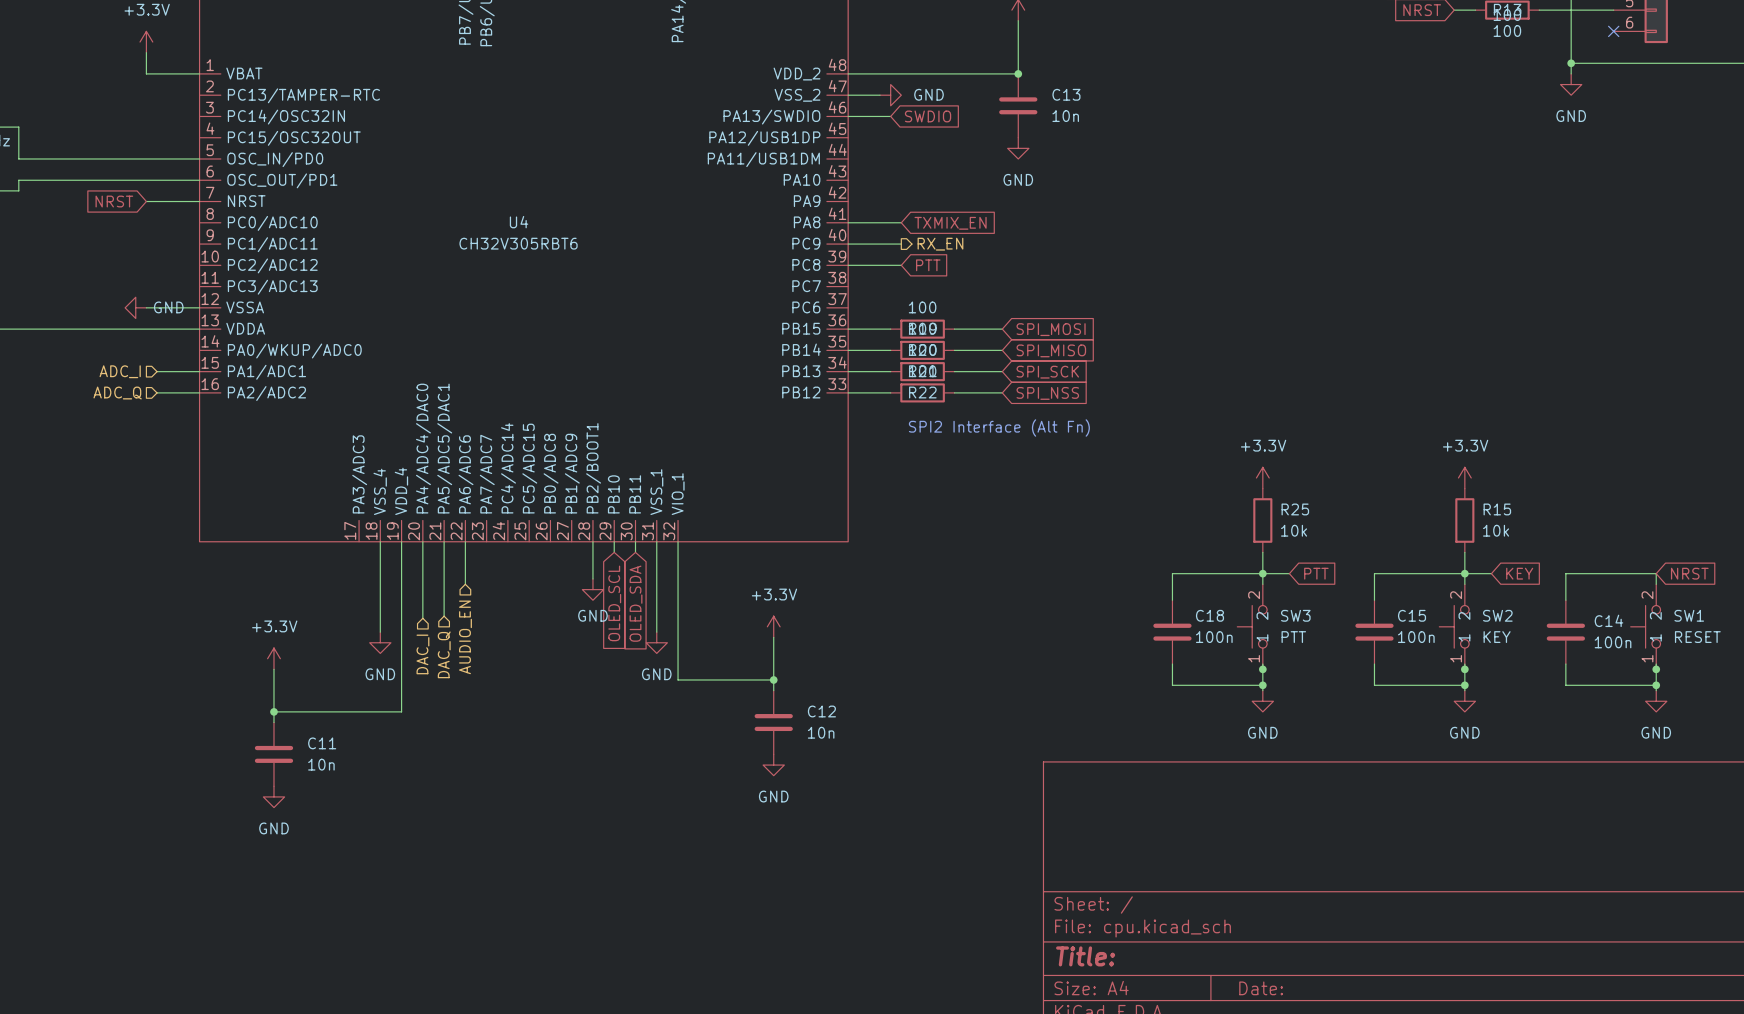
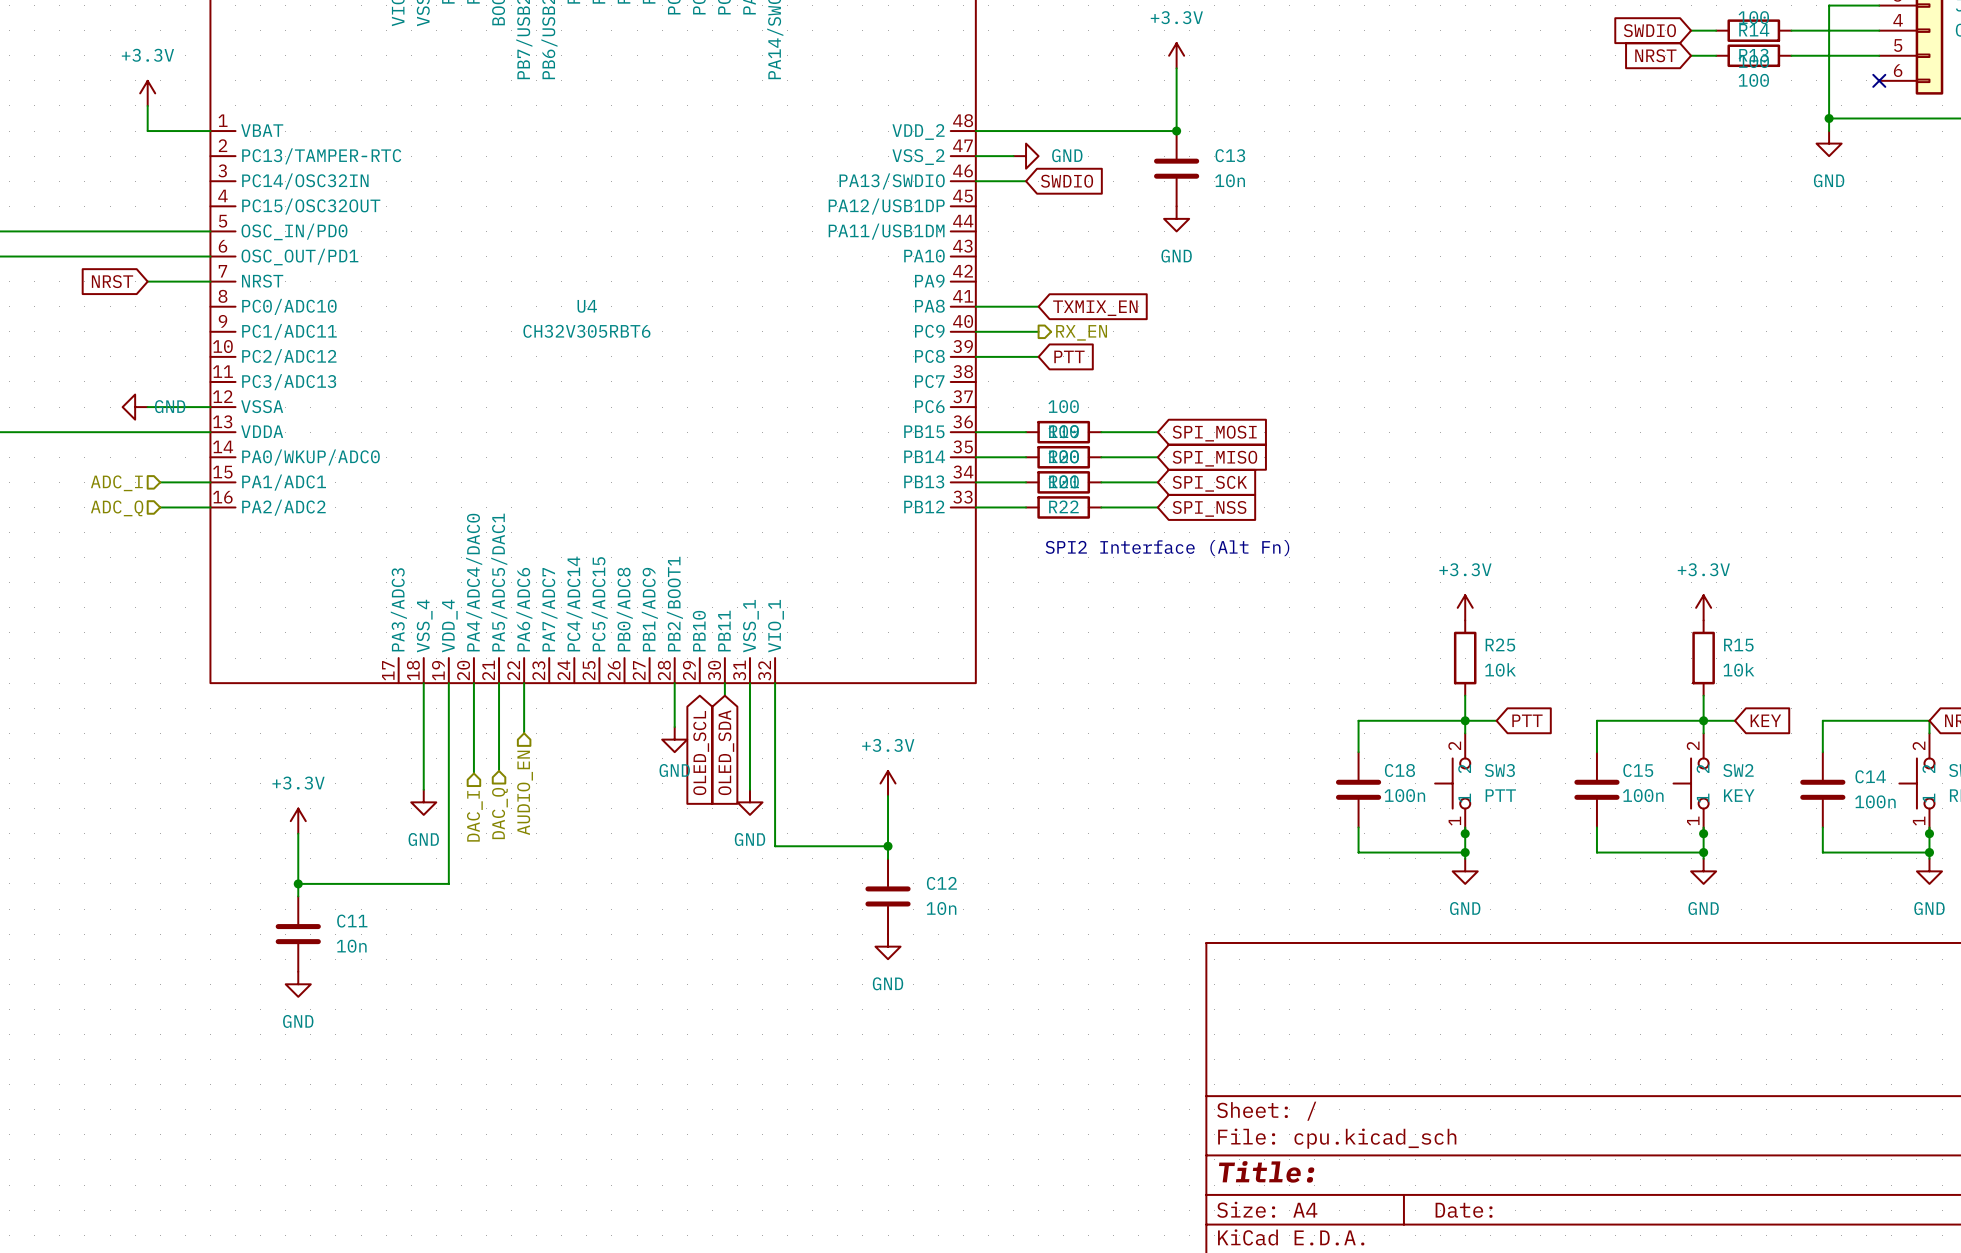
wire: (614, 541) (614, 552) -> none

